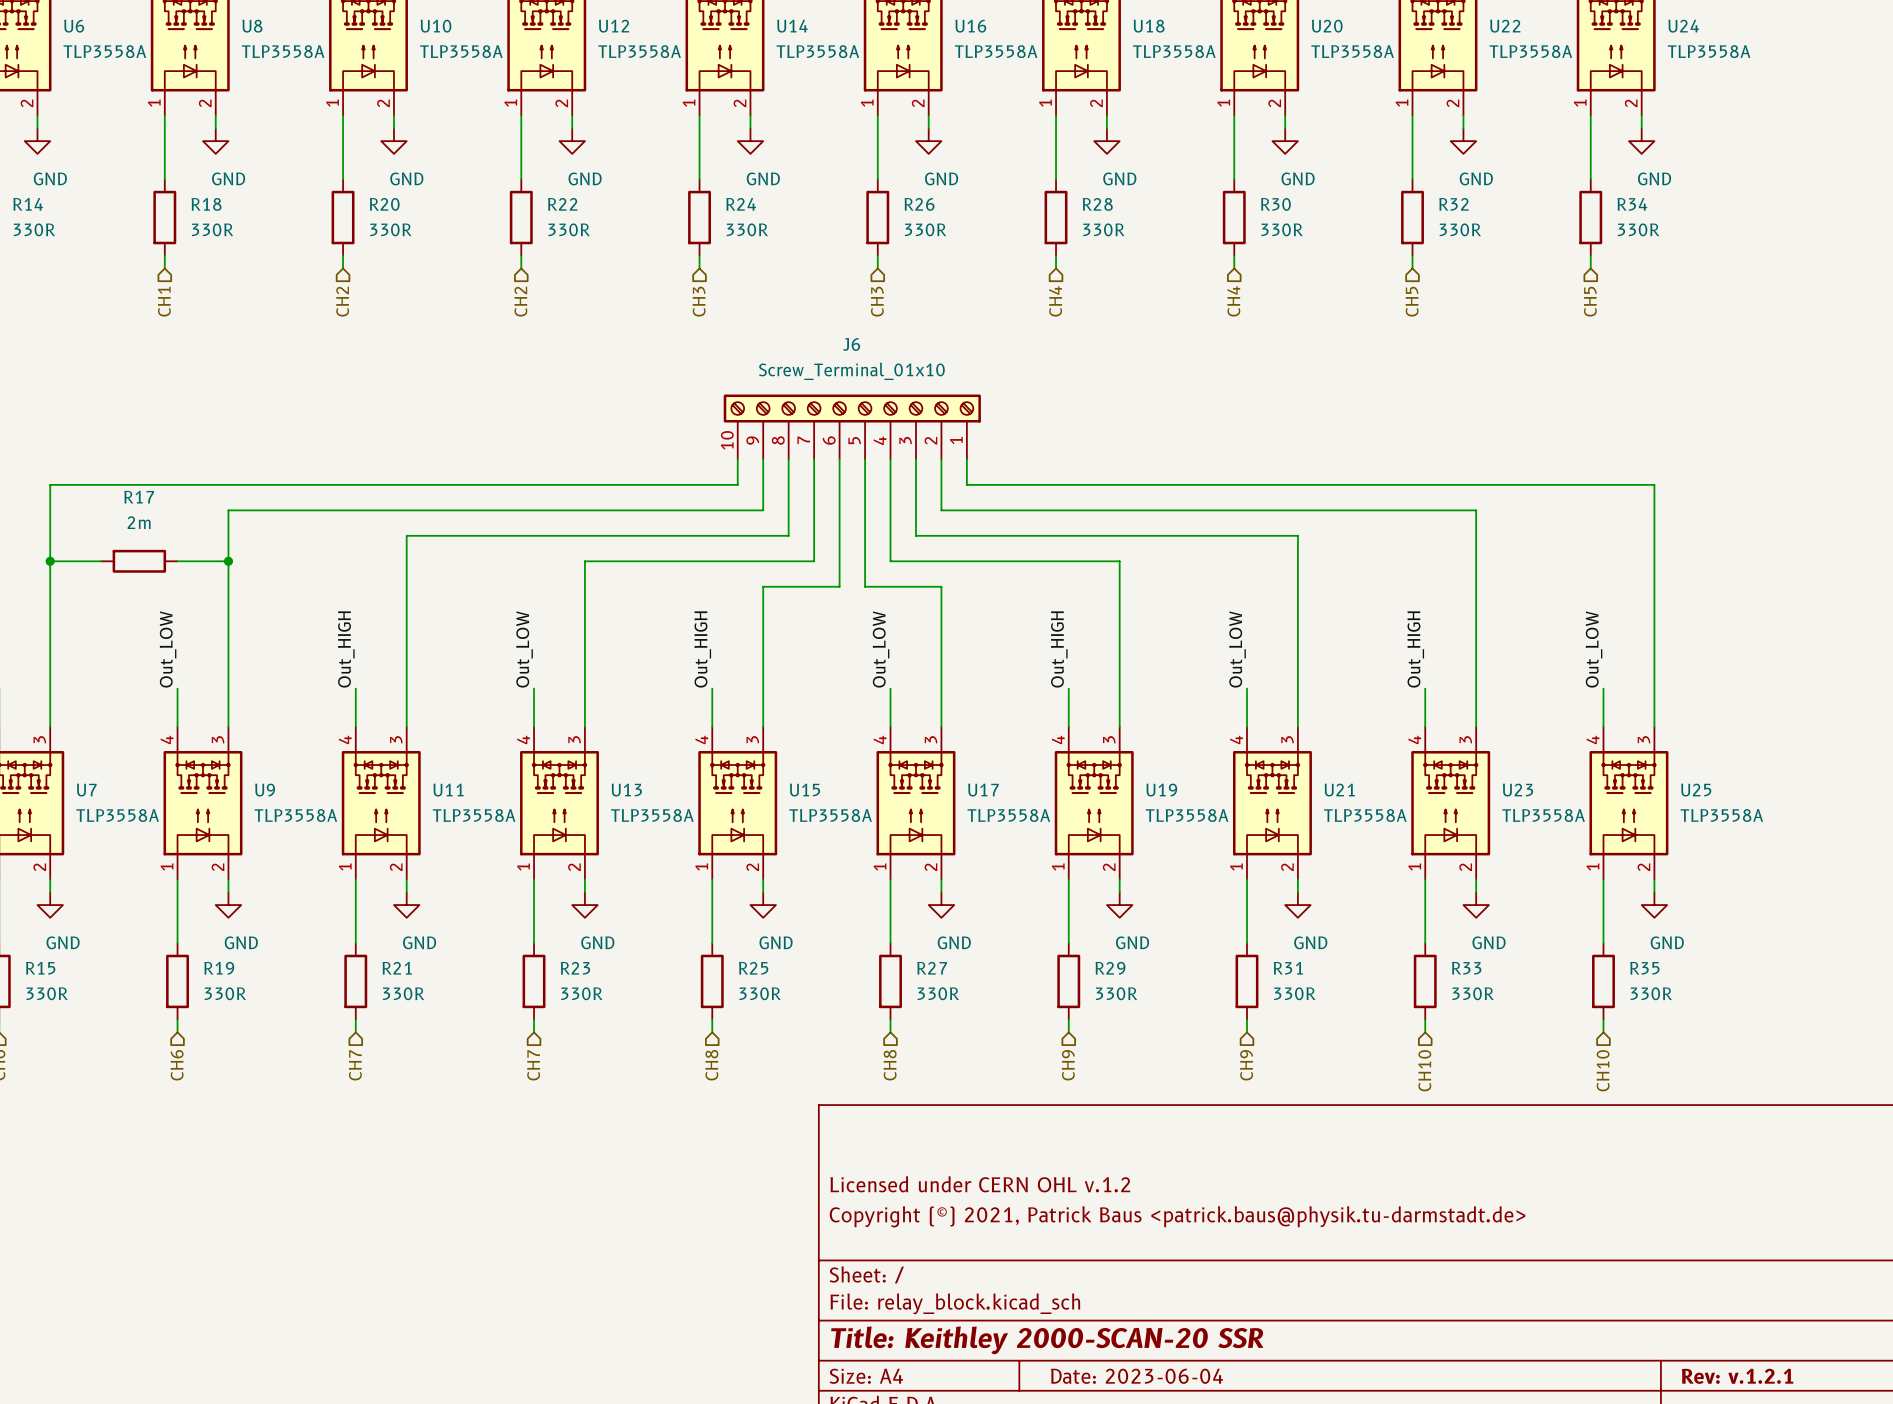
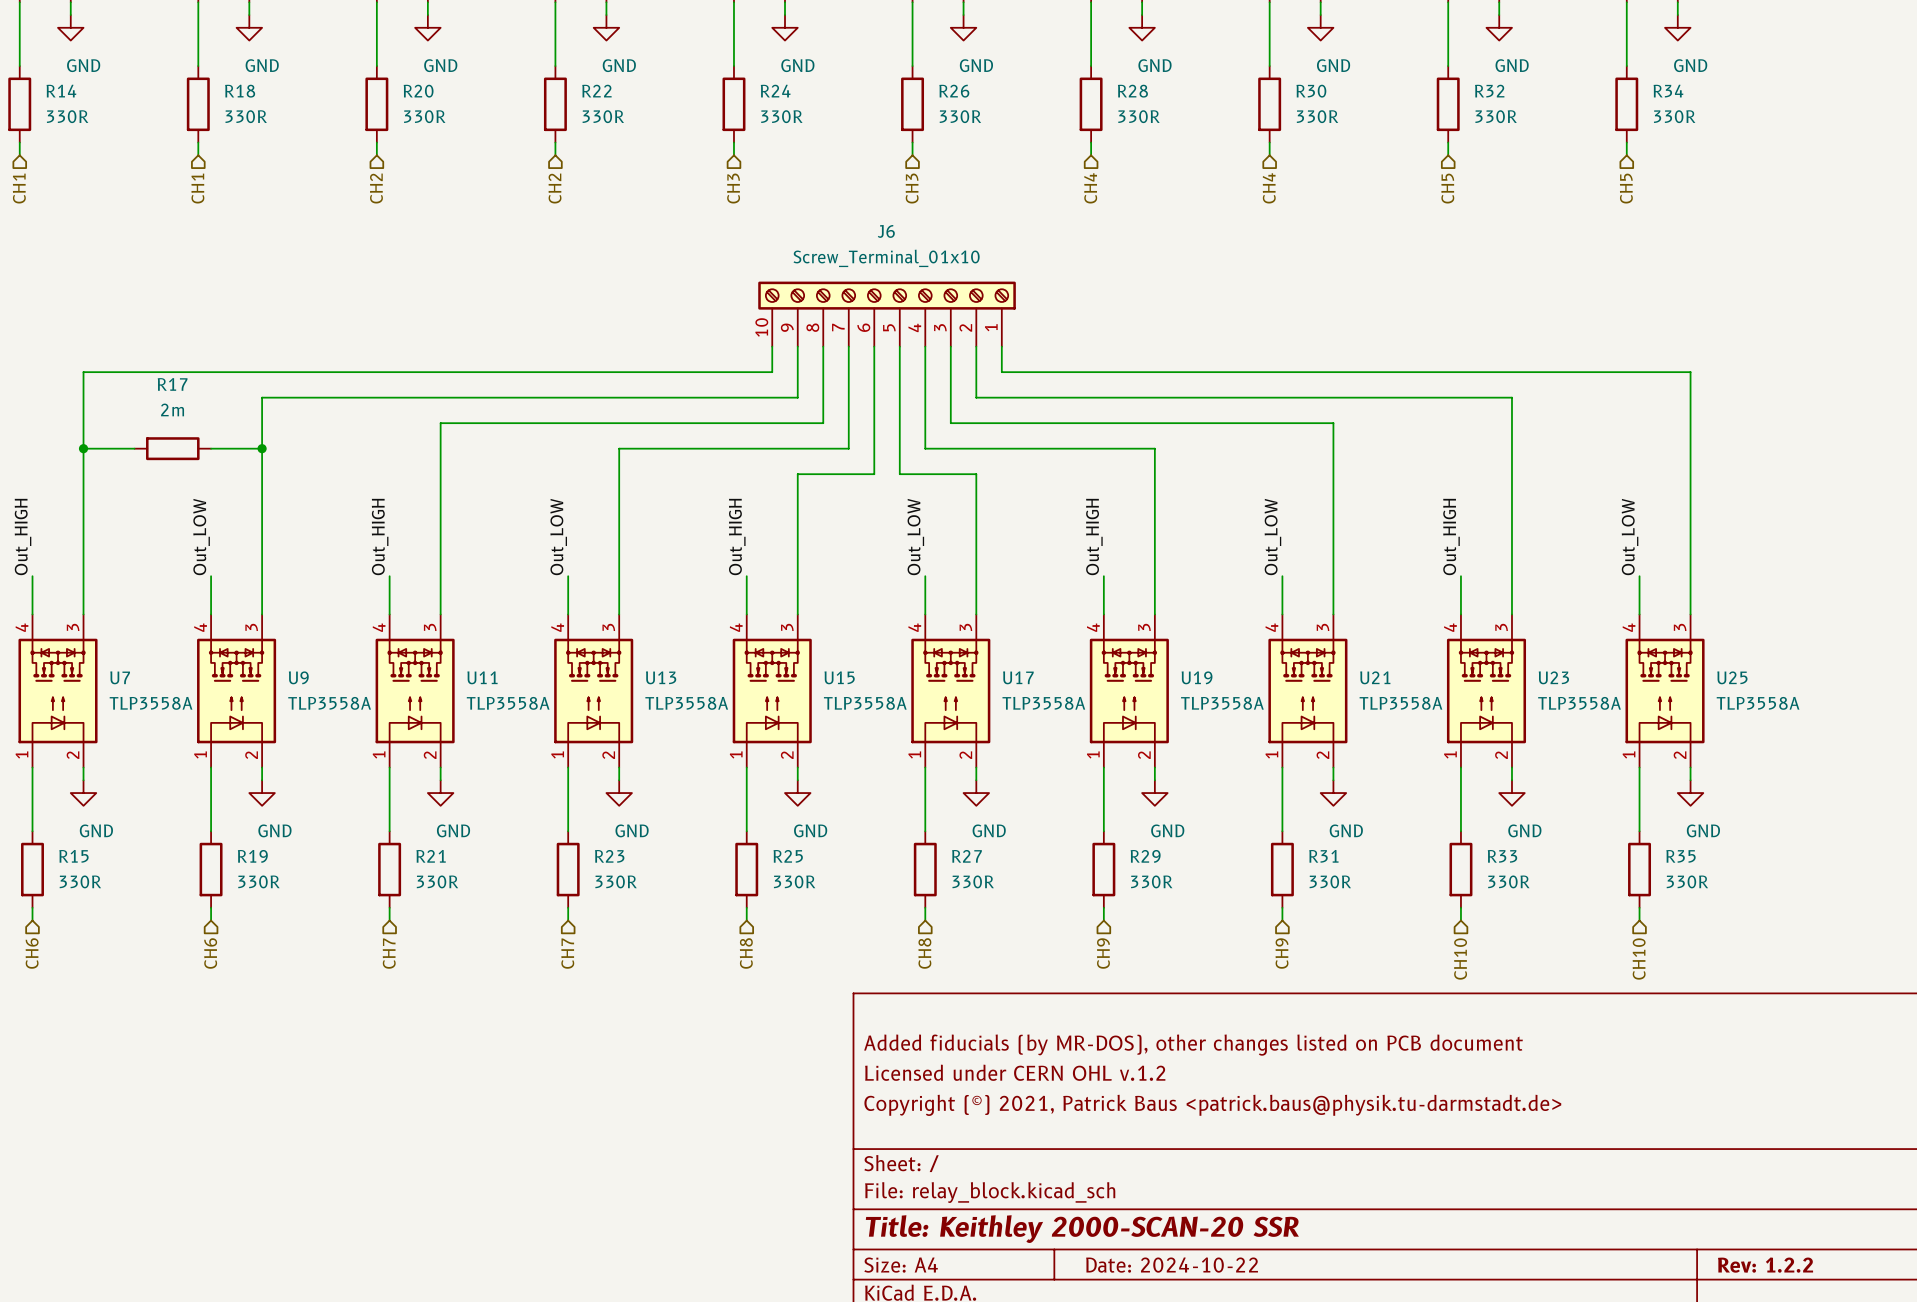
title block: none -> Added fiducials (by MR-DOS), other changes listed on PCB document (1193, 1045)
title block: Date: 2023-06-04 (1137, 1376) -> Date: 2024-10-22 (1172, 1265)
title block: Rev: v.1.2.1 (1737, 1376) -> Rev: 1.2.2 (1765, 1265)

